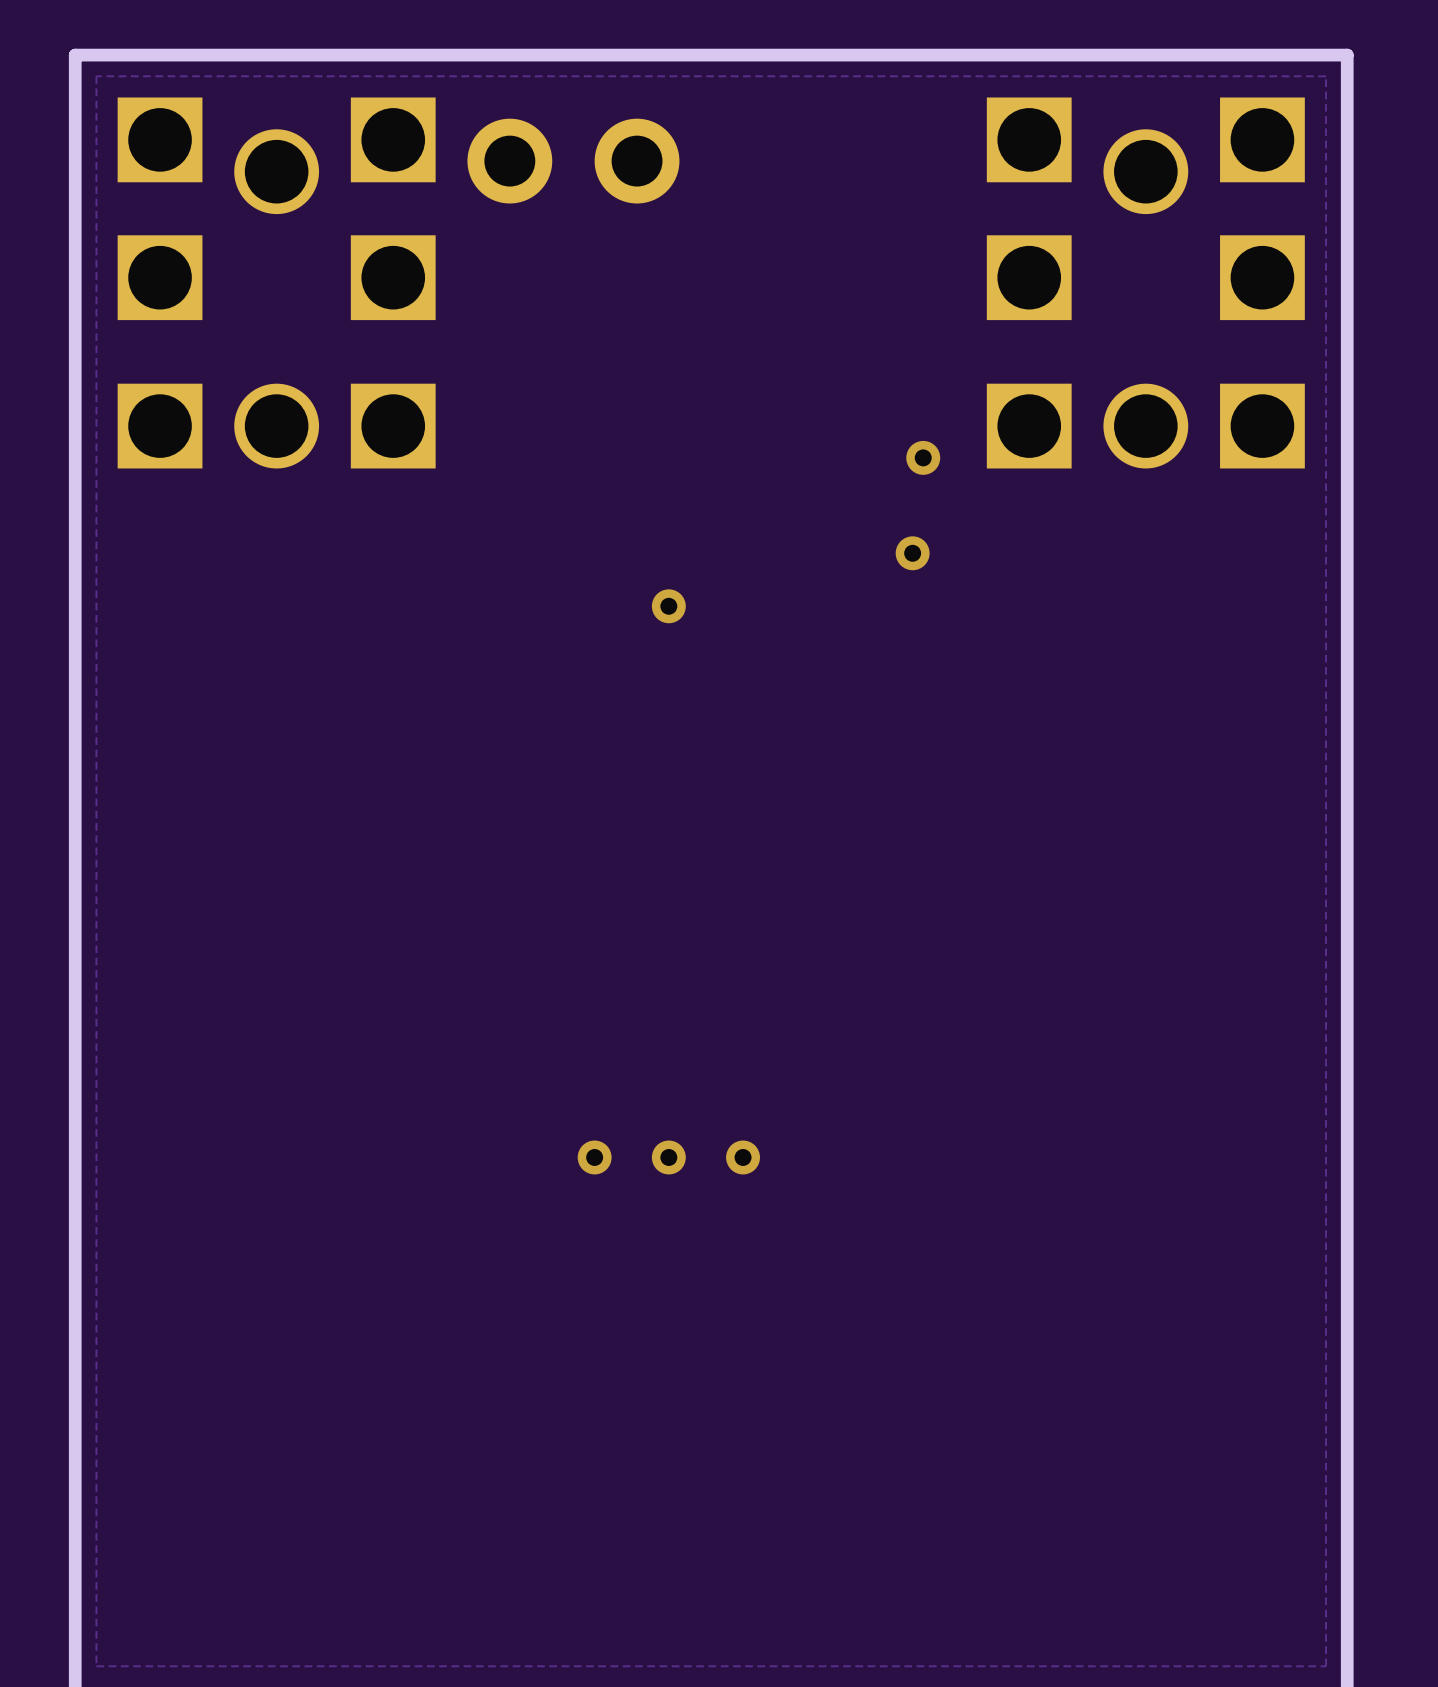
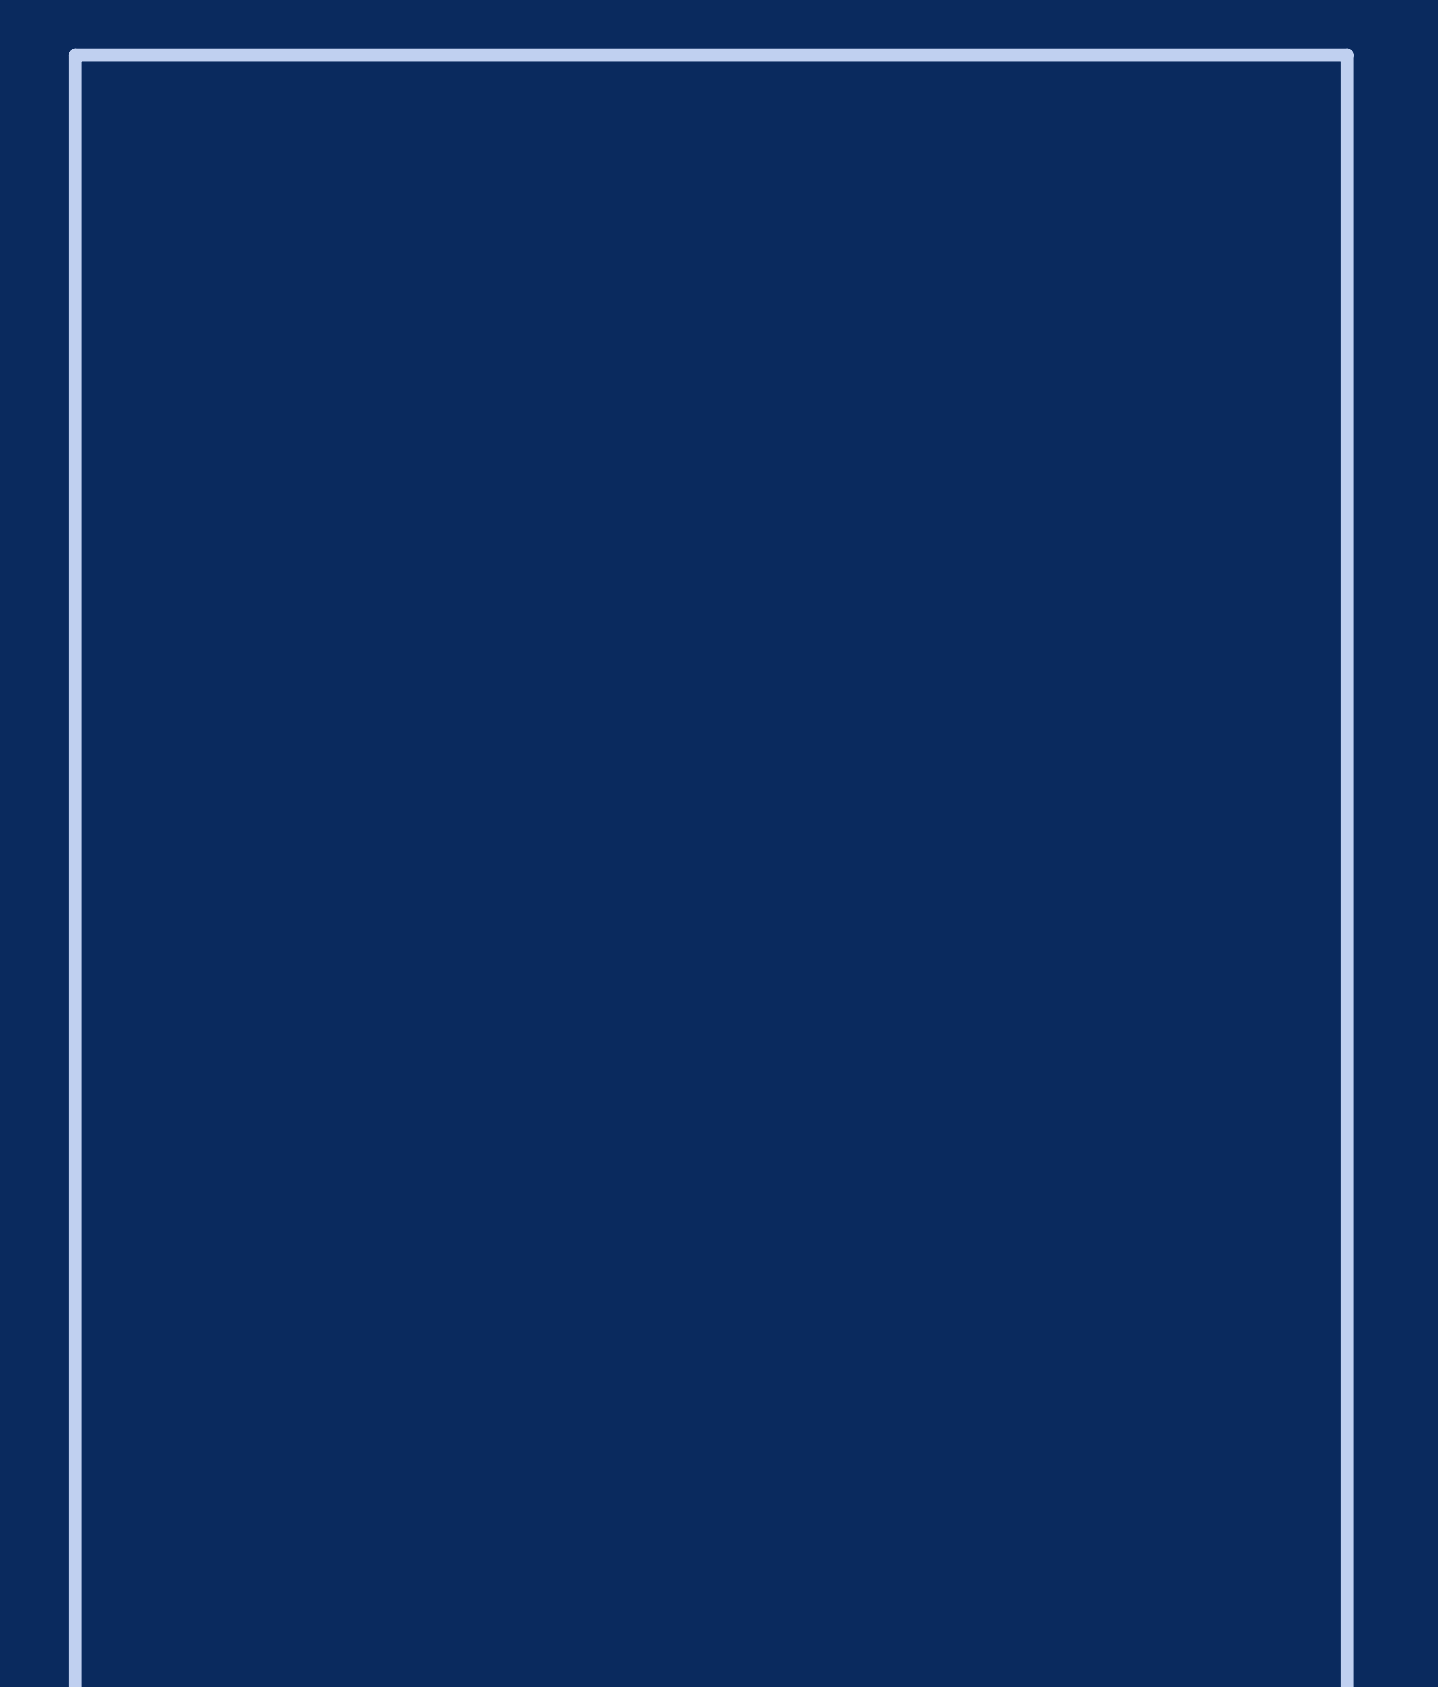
zone outline: (1326, 76) (96, 76) (96, 1666) (1326, 1666) (1326, 76) -> none
part: (509, 161) -> none
part: (637, 161) -> none
part: (276, 282) -> none
part: (1145, 282) -> none
via: (923, 457) -> none
via: (912, 553) -> none
via: (668, 606) -> none
via: (594, 1157) -> none
via: (668, 1157) -> none
via: (743, 1157) -> none

